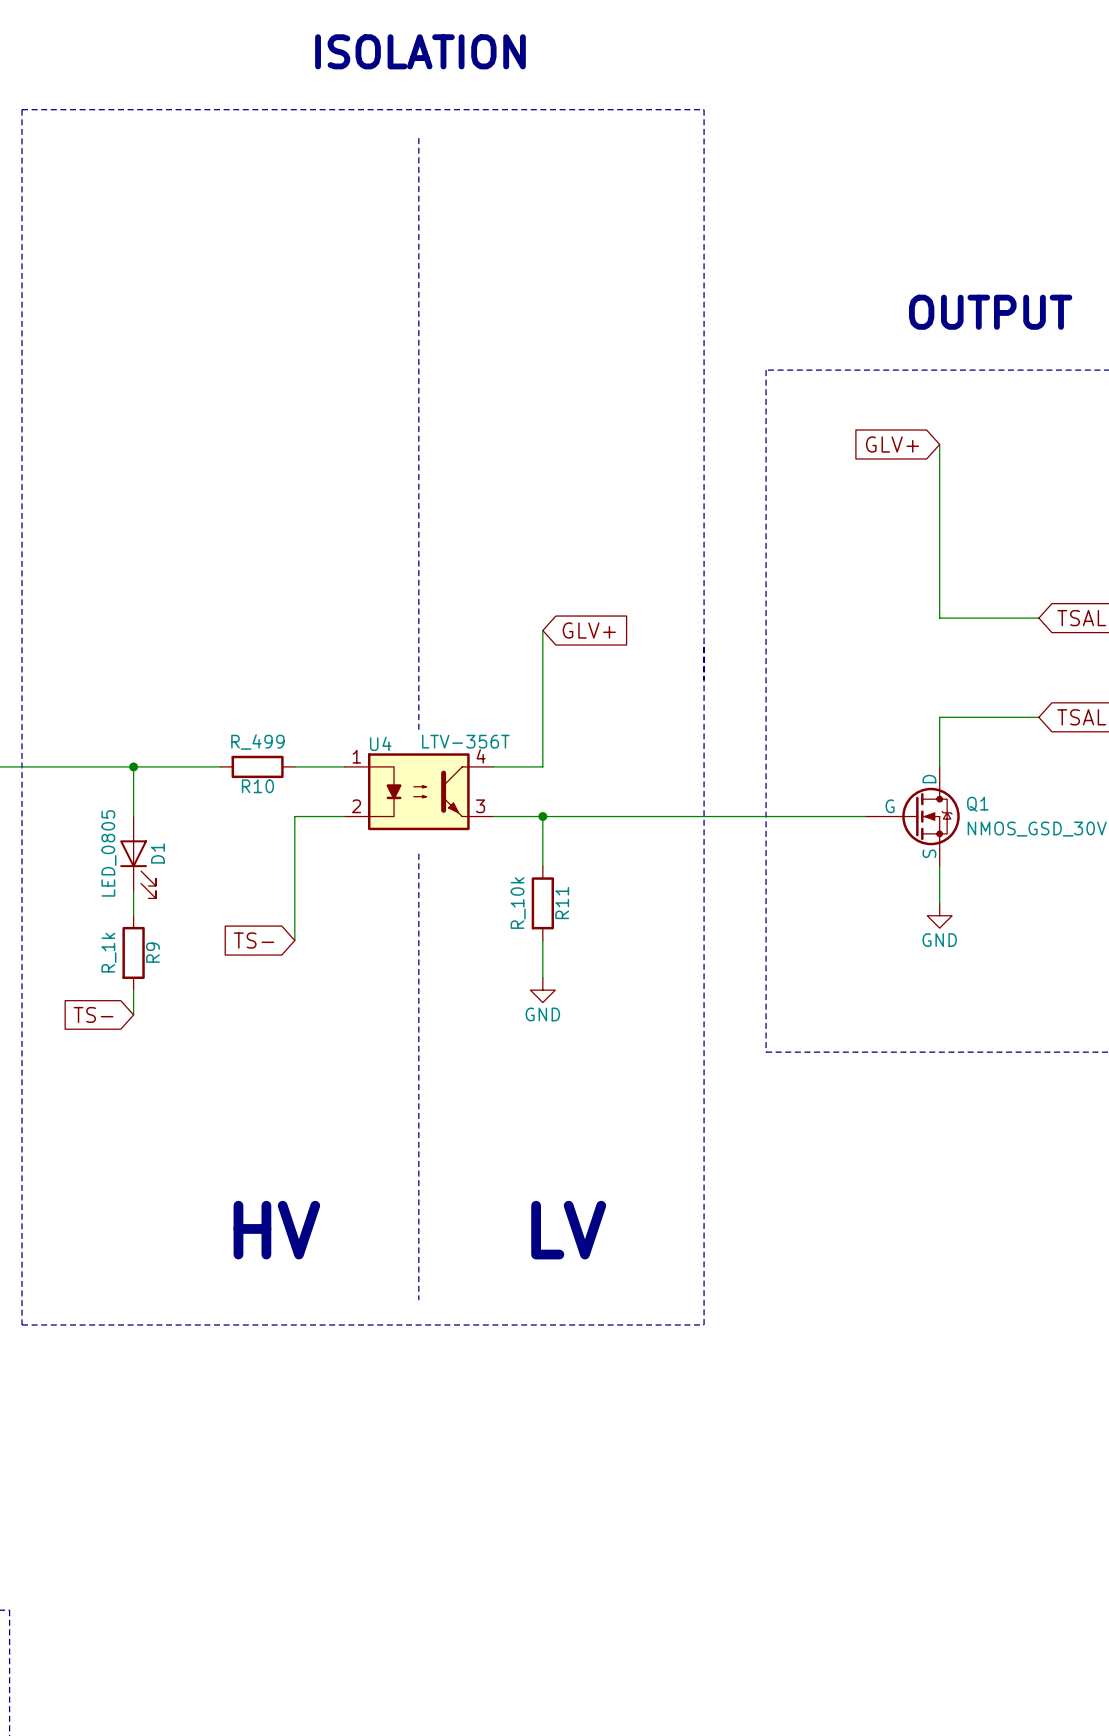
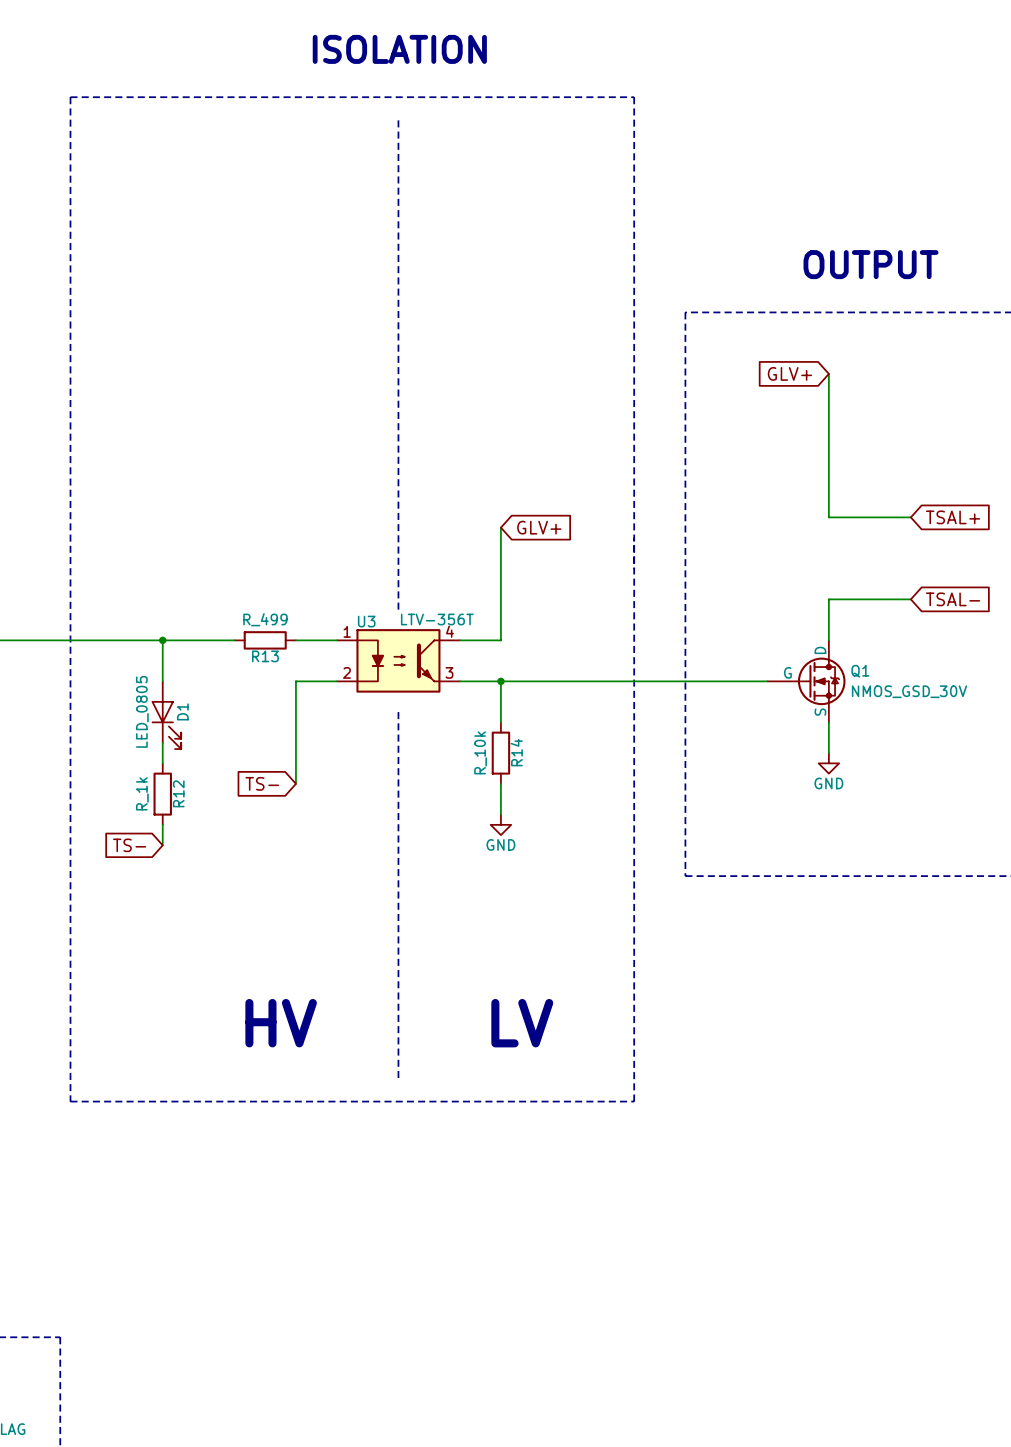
U4 name: U4 (380, 743) -> U3 (366, 621)
R10 name: R10 (257, 786) -> R13 (265, 656)
R11 name: R11 (562, 903) -> R14 (516, 752)
R9 name: R9 (152, 952) -> R12 (178, 793)

